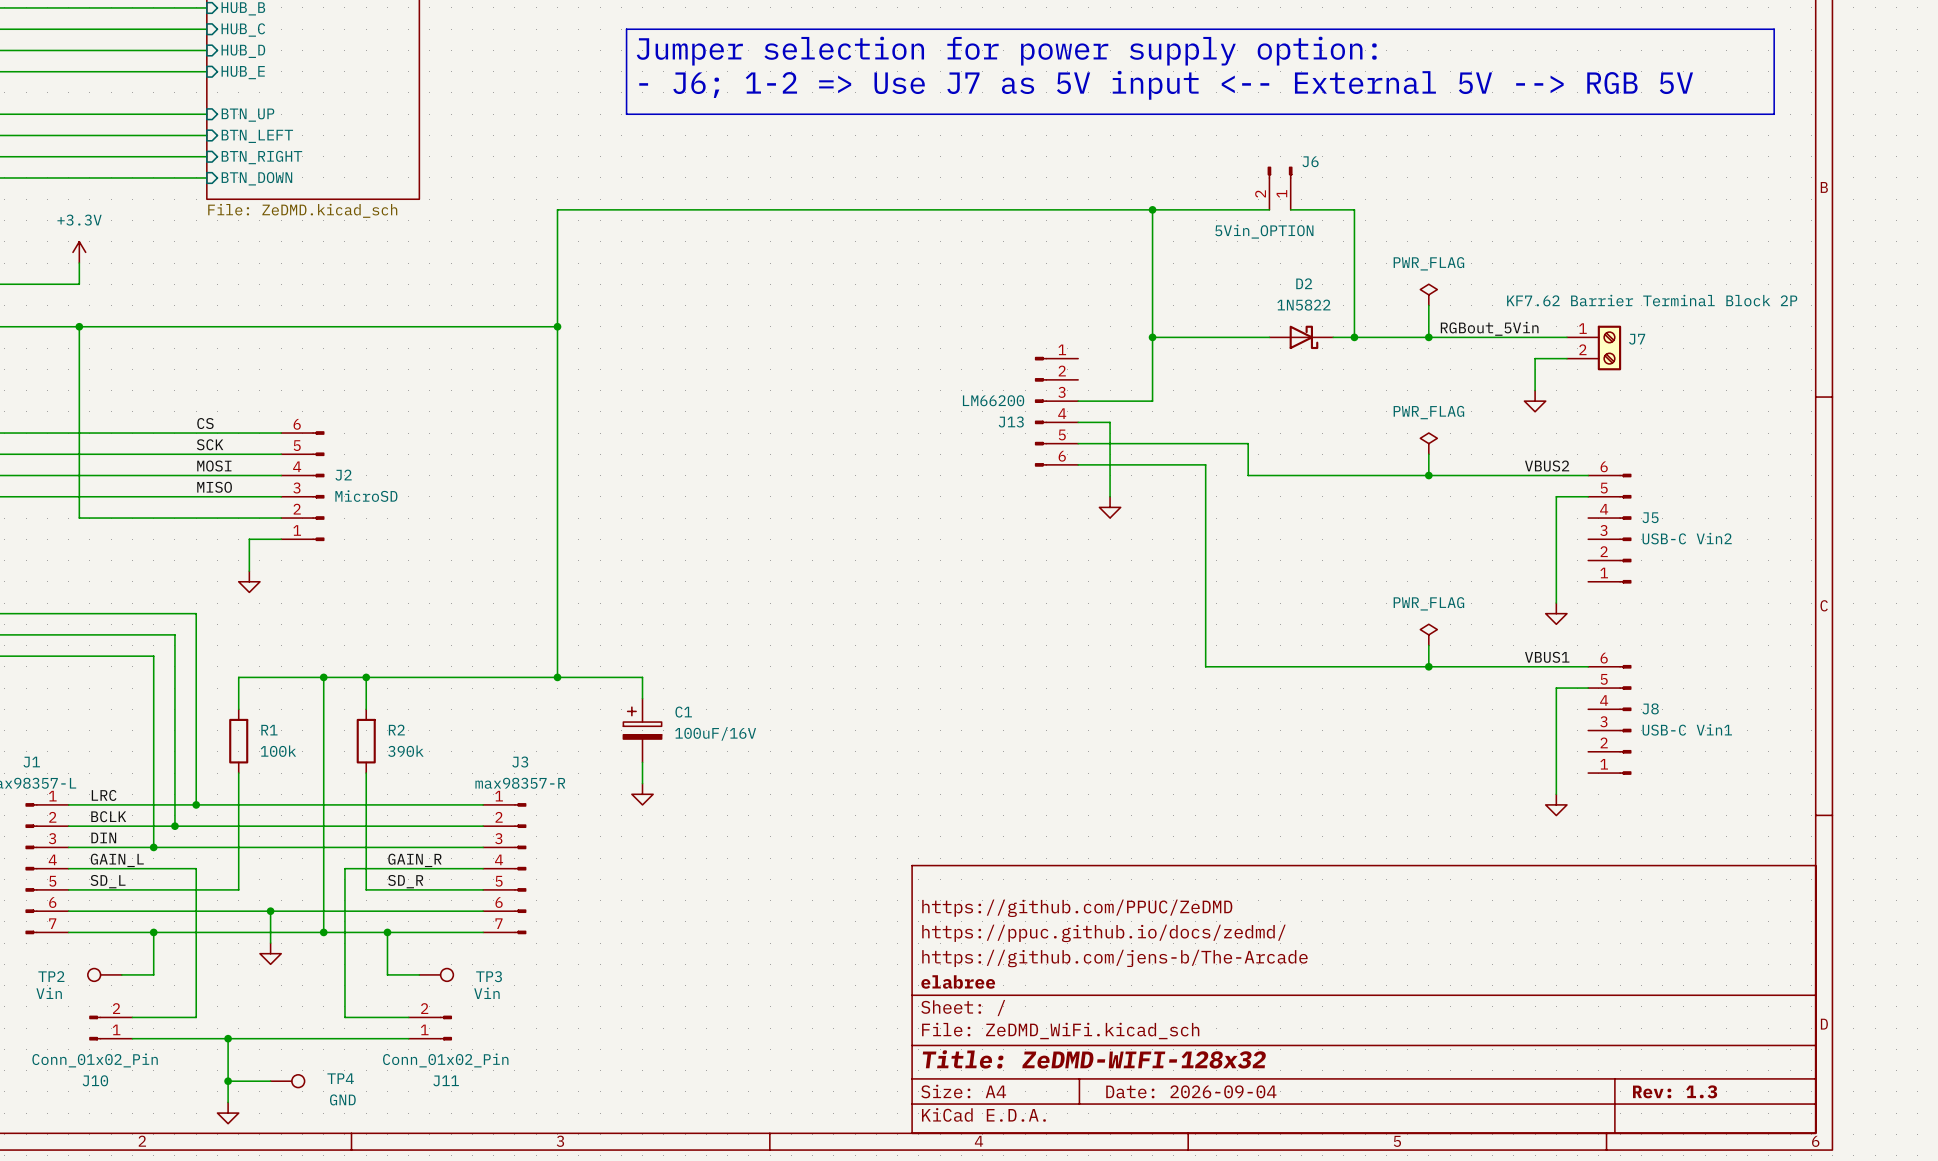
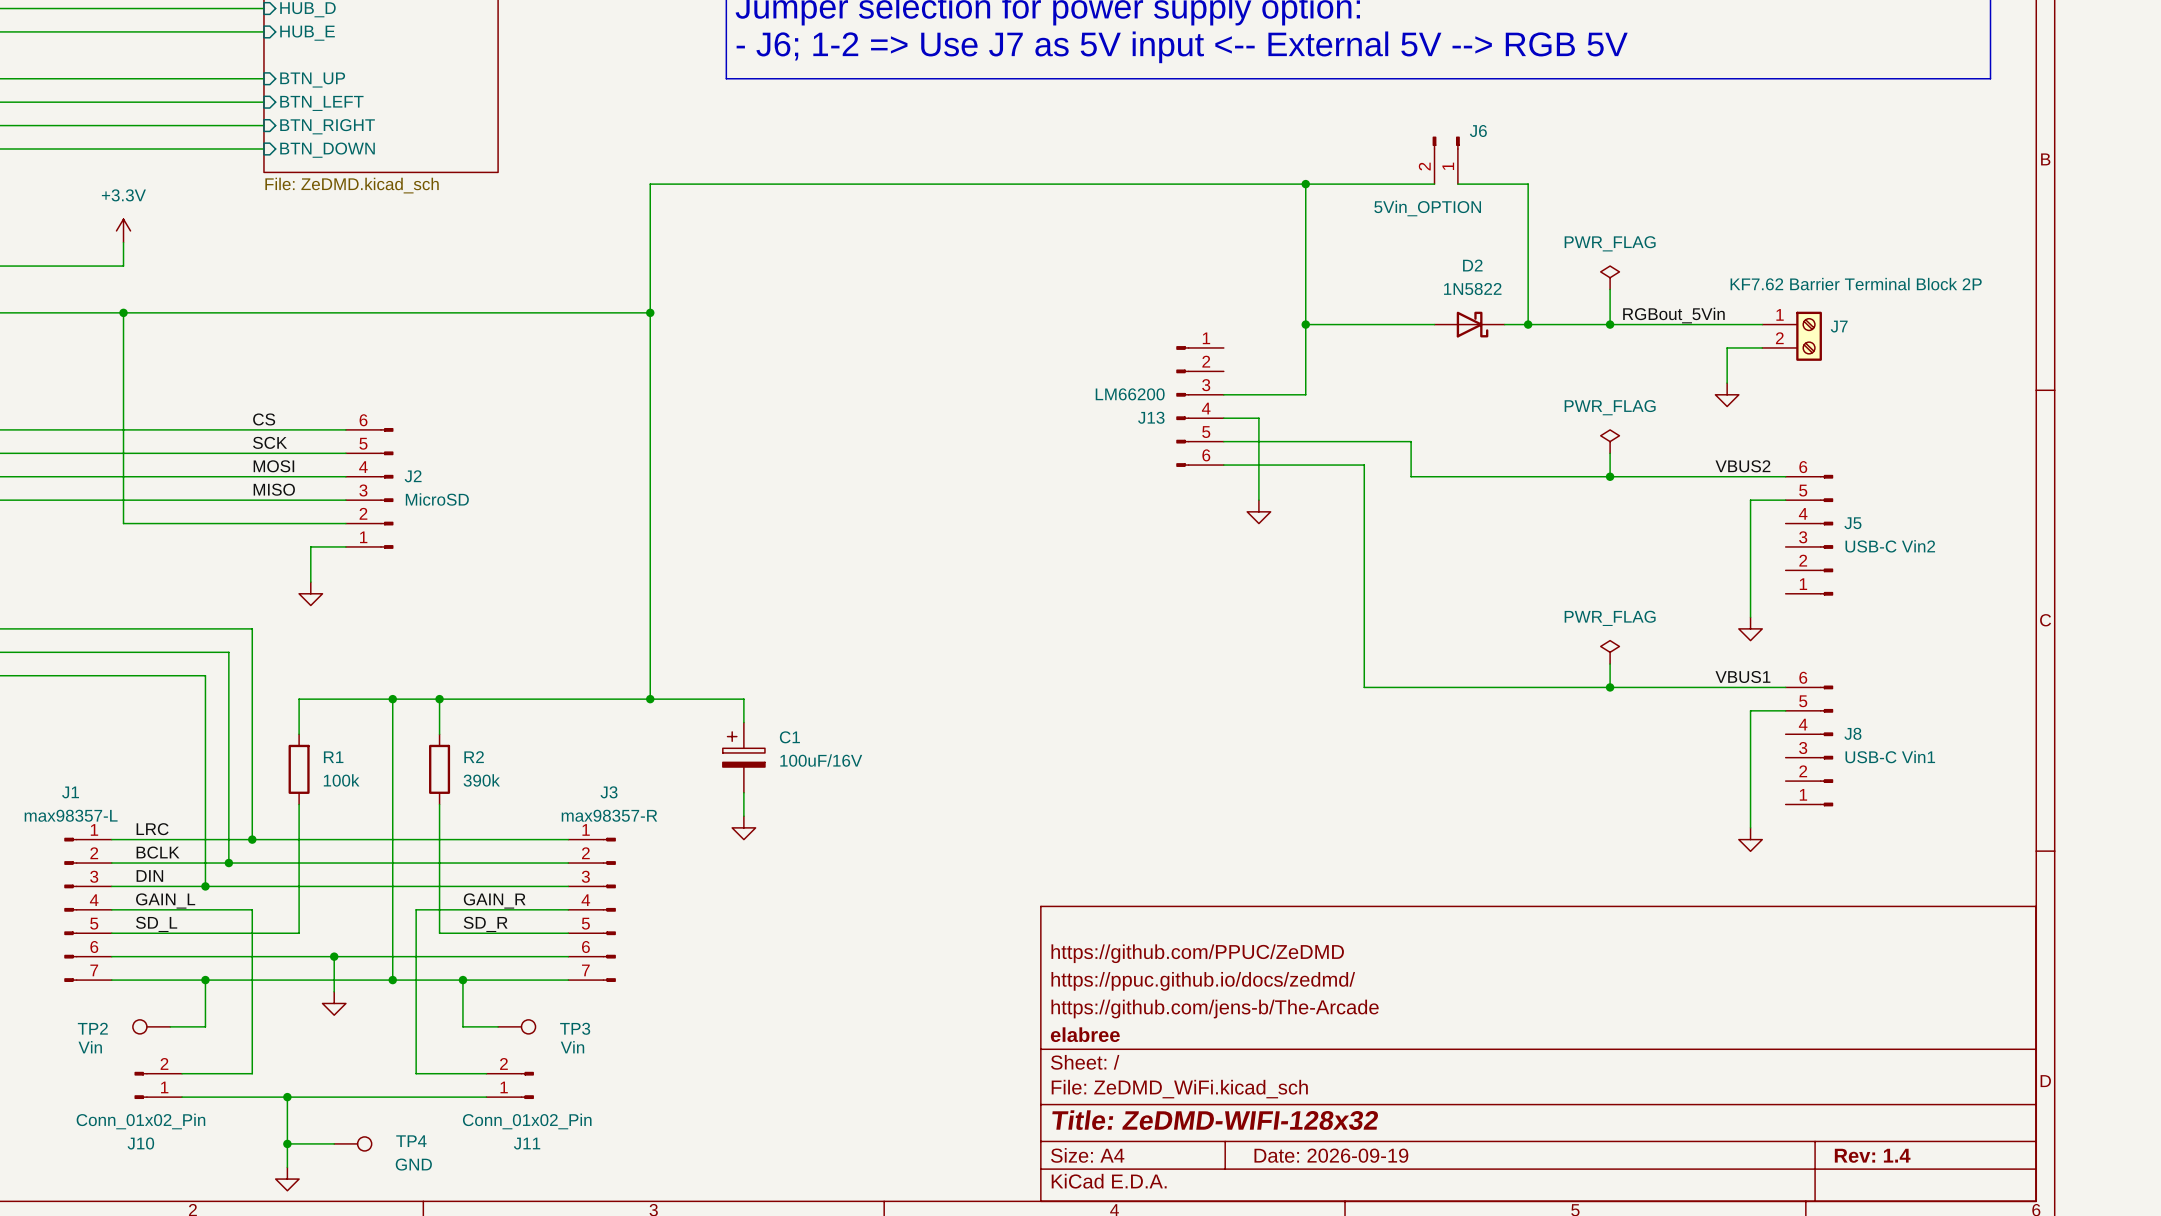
title block: Date: 2026-09-04 (1191, 1091) -> Date: 2026-09-19 (1331, 1155)
title block: Rev: 1.3 (1675, 1091) -> Rev: 1.4 (1872, 1155)

